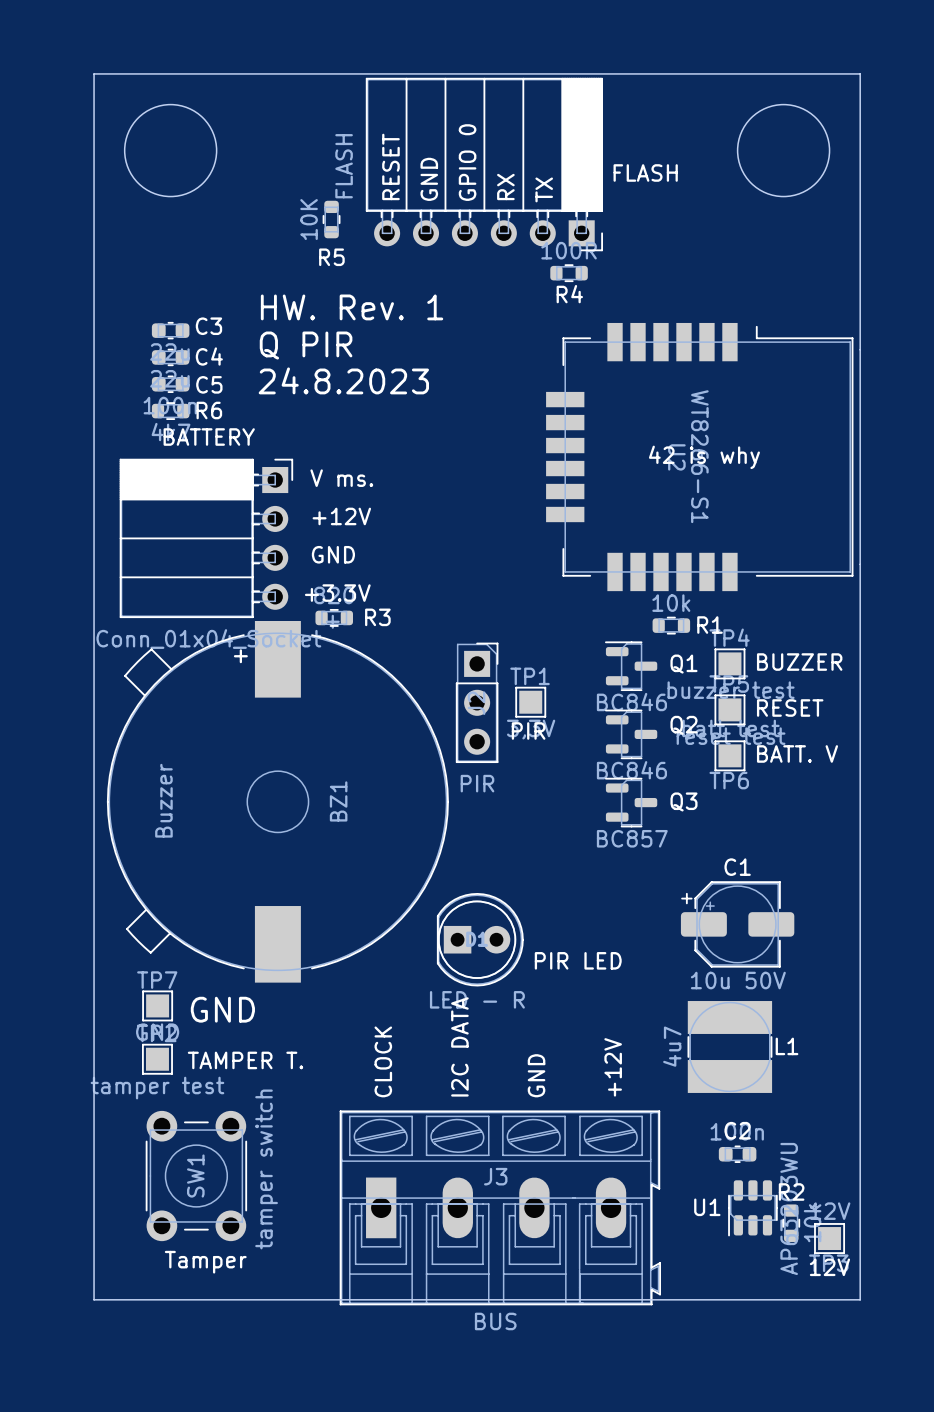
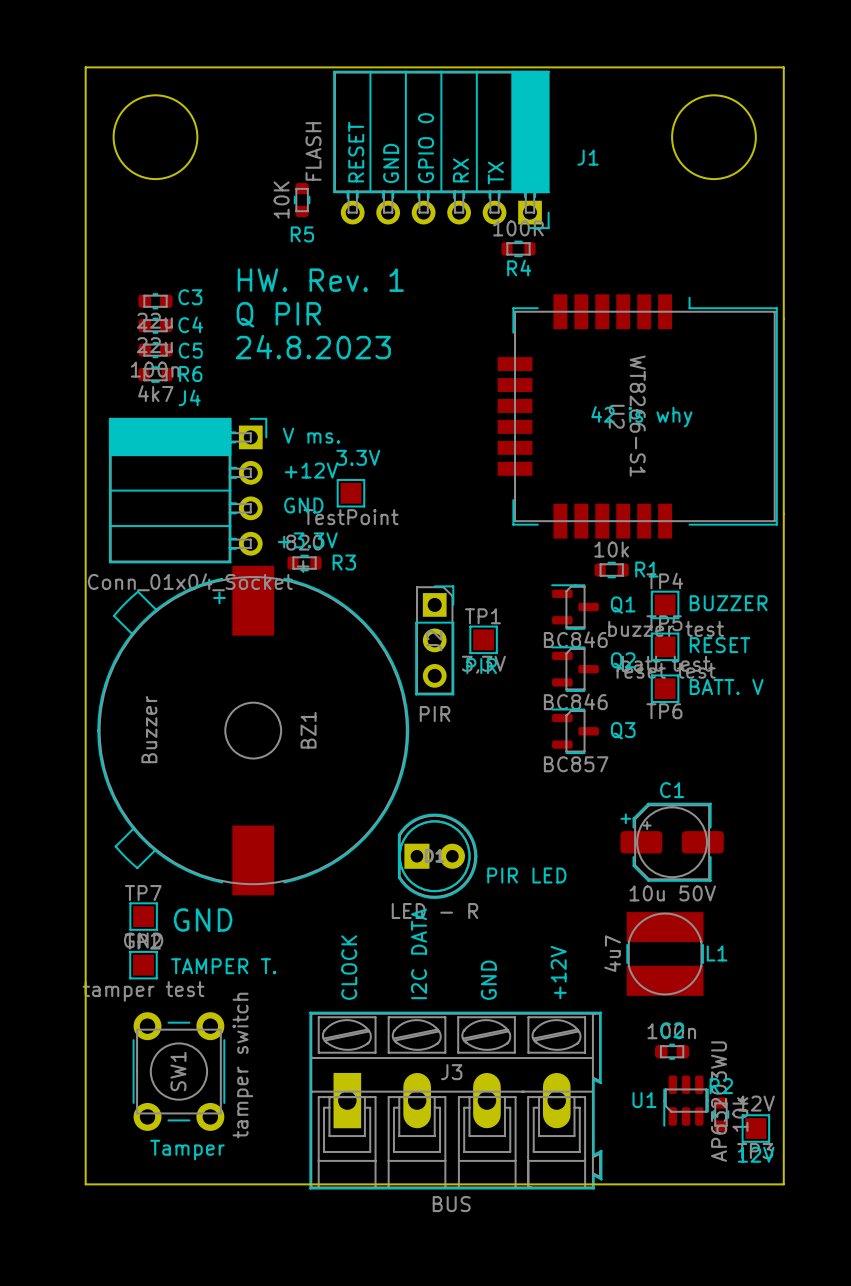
FLASH name: FLASH (645, 172) -> J1 (587, 157)
BATTERY name: BATTERY (209, 437) -> J4 (189, 397)
3.3V: none -> TestPoint (350, 493)

